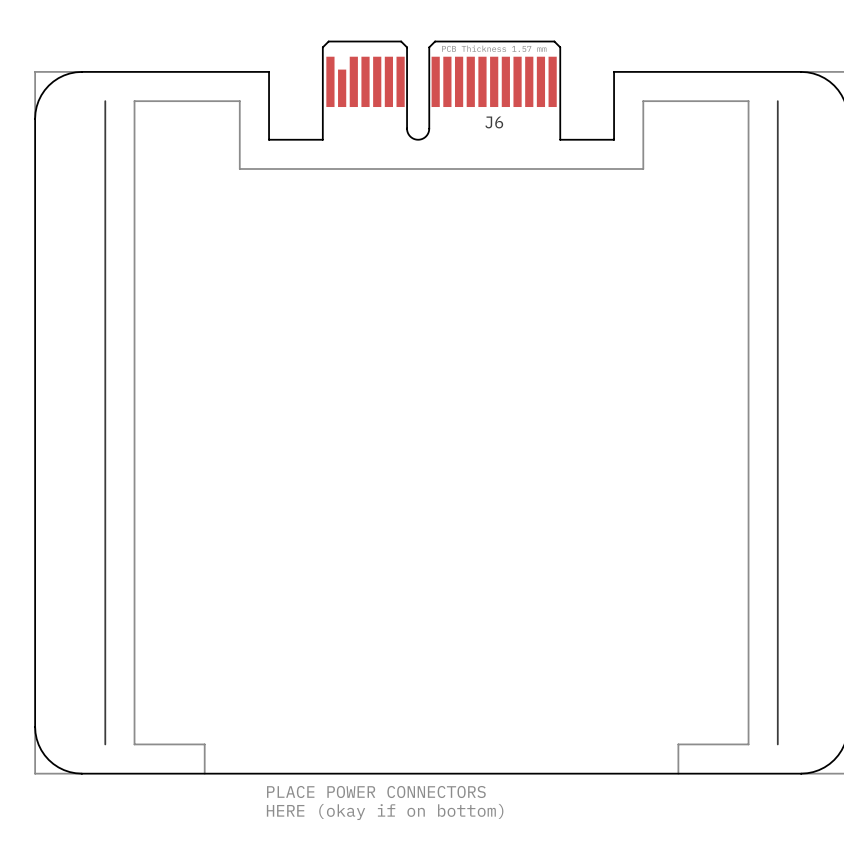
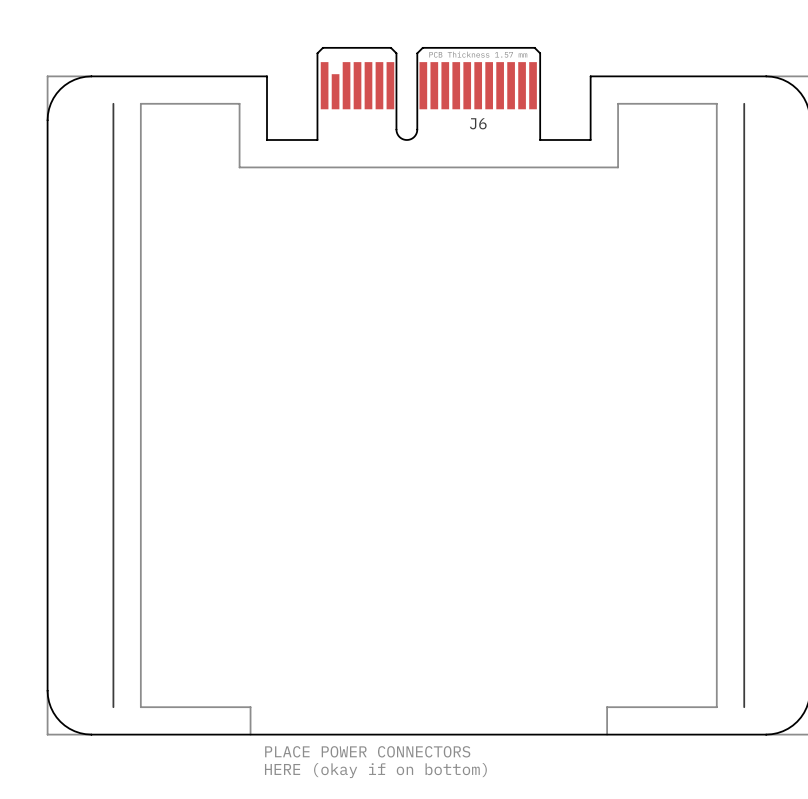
line: (204, 744) (204, 773) -> (206, 707) (250, 707) (250, 734)
line: (678, 744) (678, 773) -> (650, 707) (607, 707) (607, 734)

